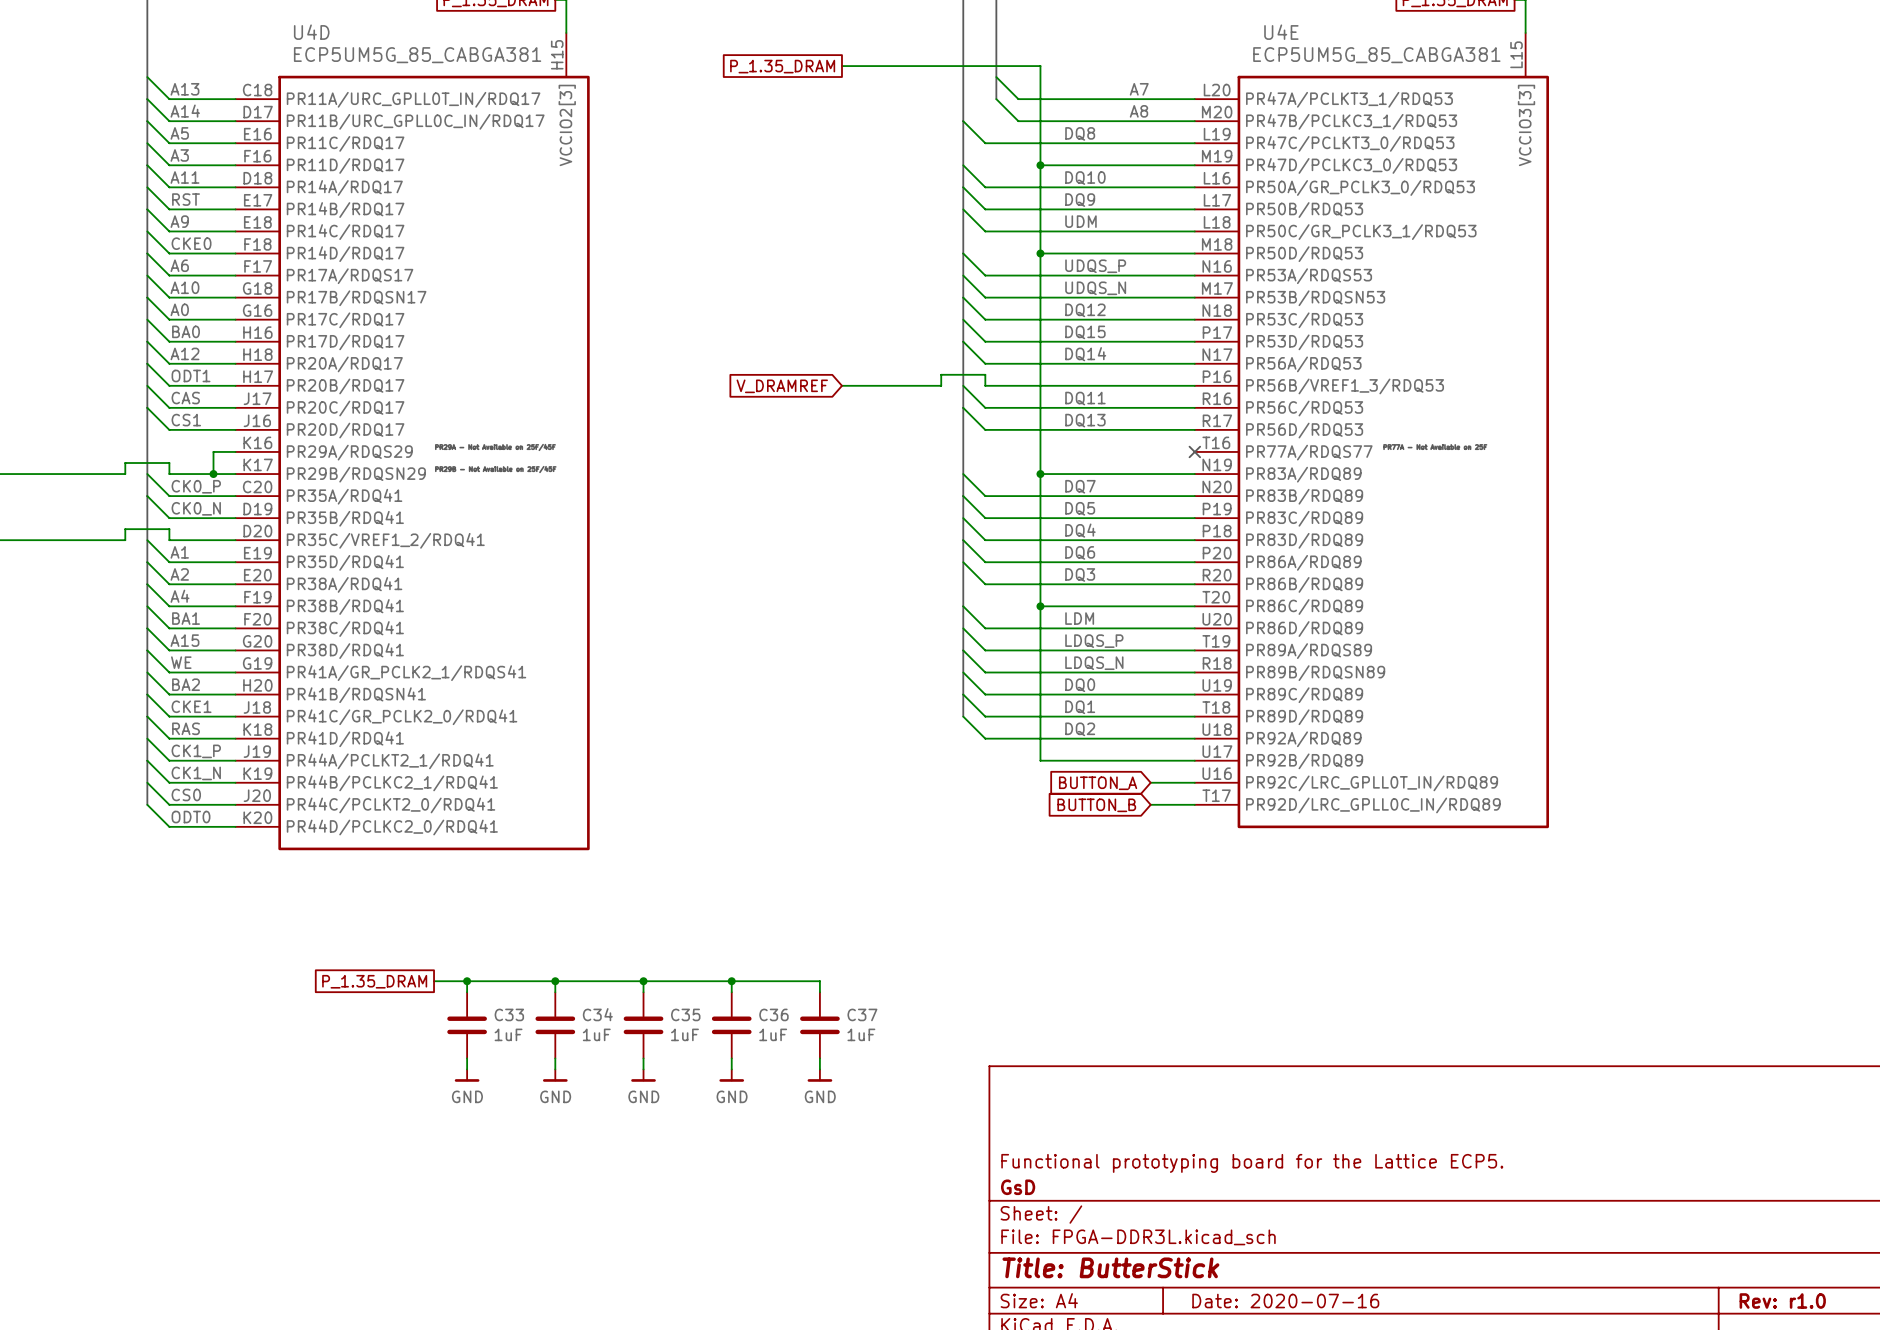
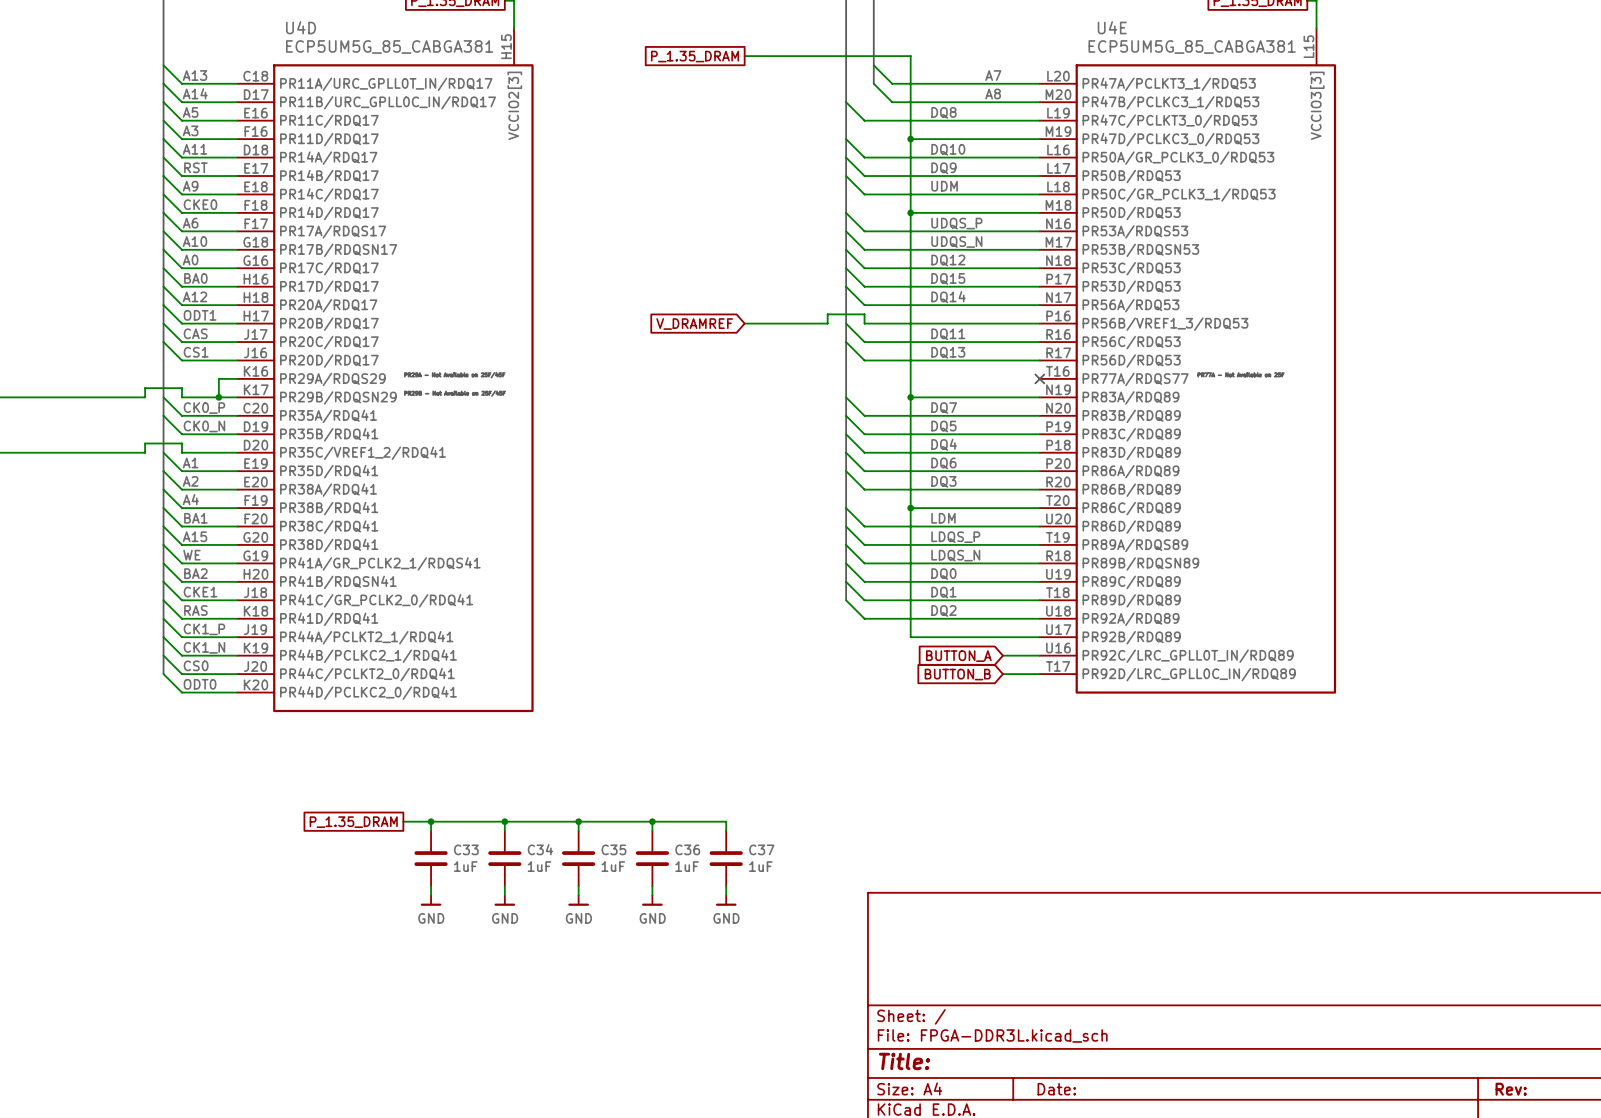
title block: Functional prototyping board for the Lattice ECP5. (1252, 1163) -> none
title block: GsD (1018, 1187) -> none
title block: Title: ButterStick (1110, 1267) -> Title: (904, 1061)
title block: Date: 2020-07-16 (1285, 1301) -> Date: (1056, 1089)
title block: Rev: r1.0 (1782, 1301) -> Rev: (1511, 1089)

